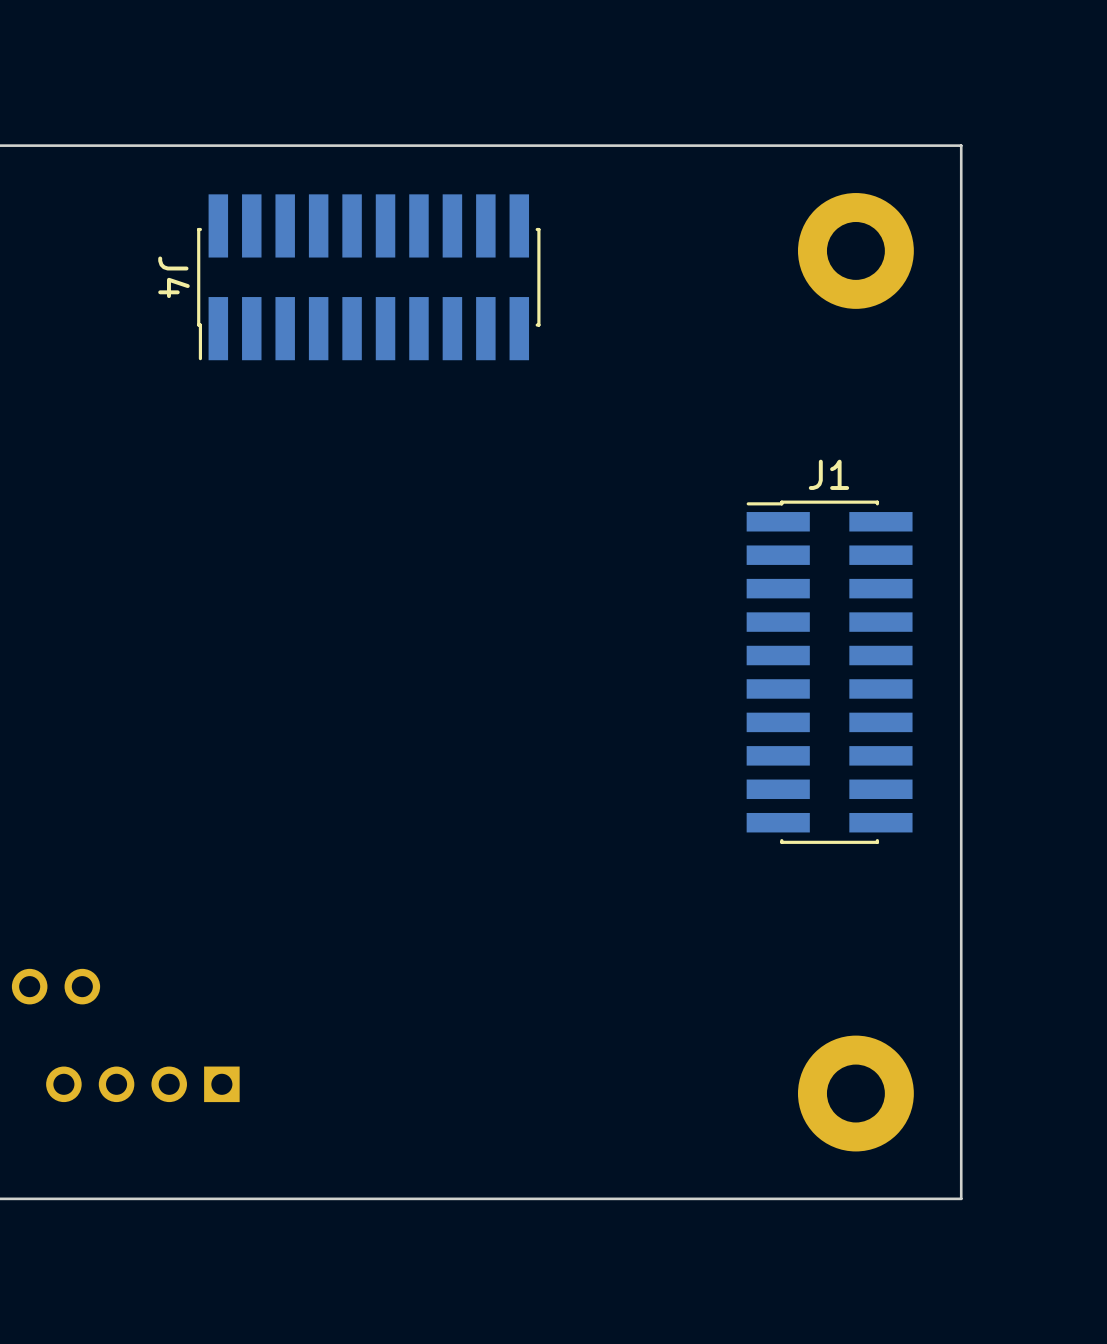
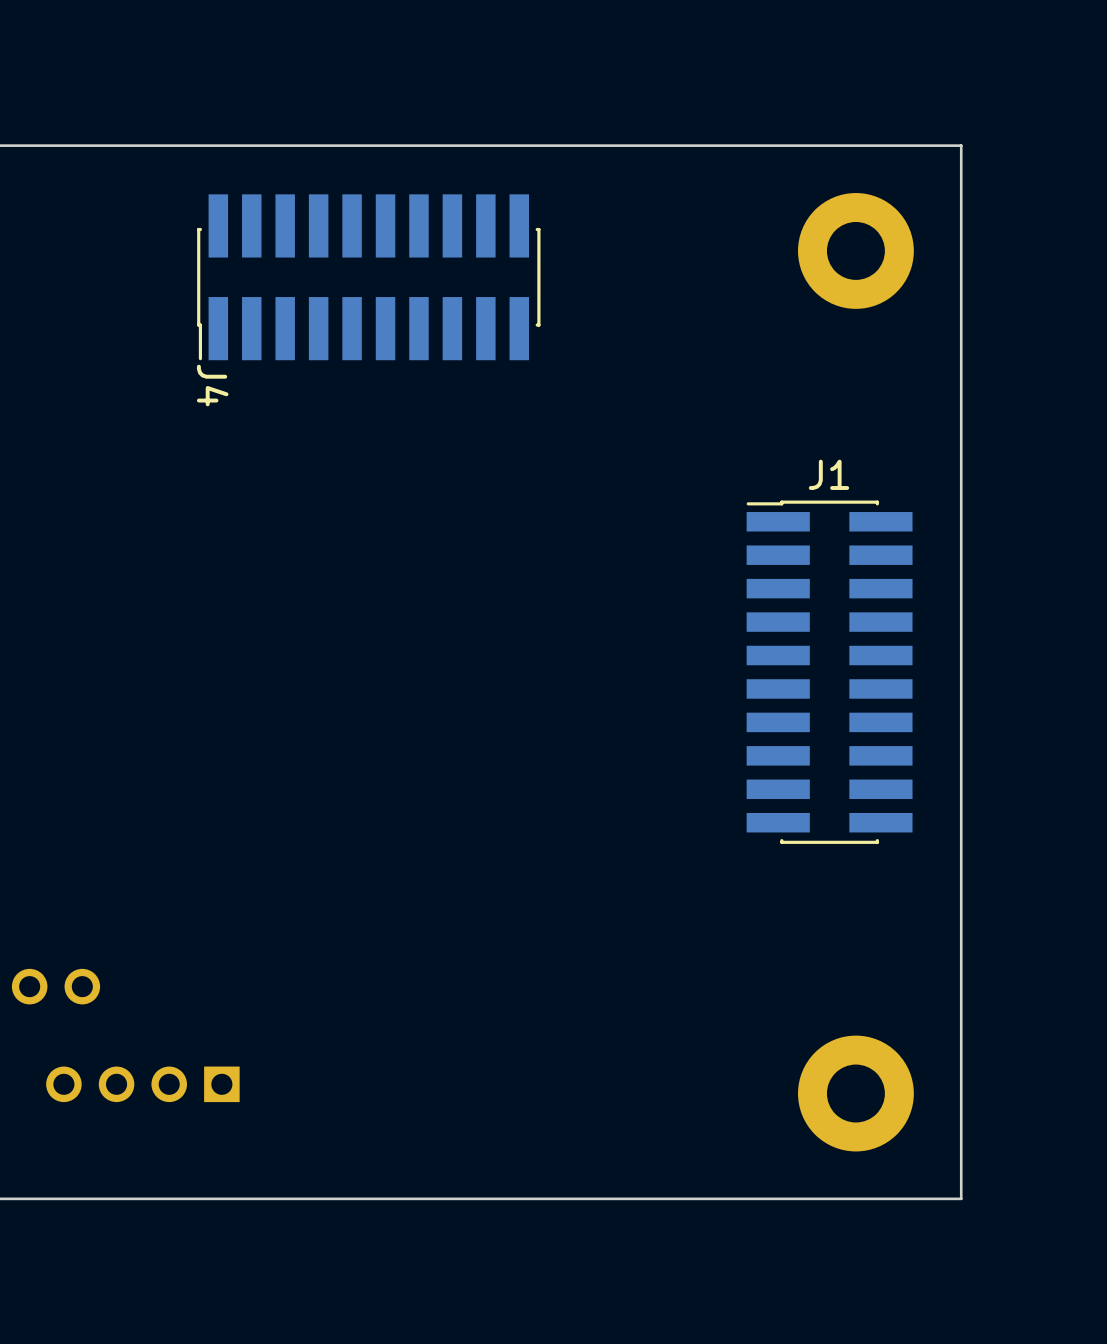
J4 name position: J4 (173, 277) -> J4 (212, 385)

